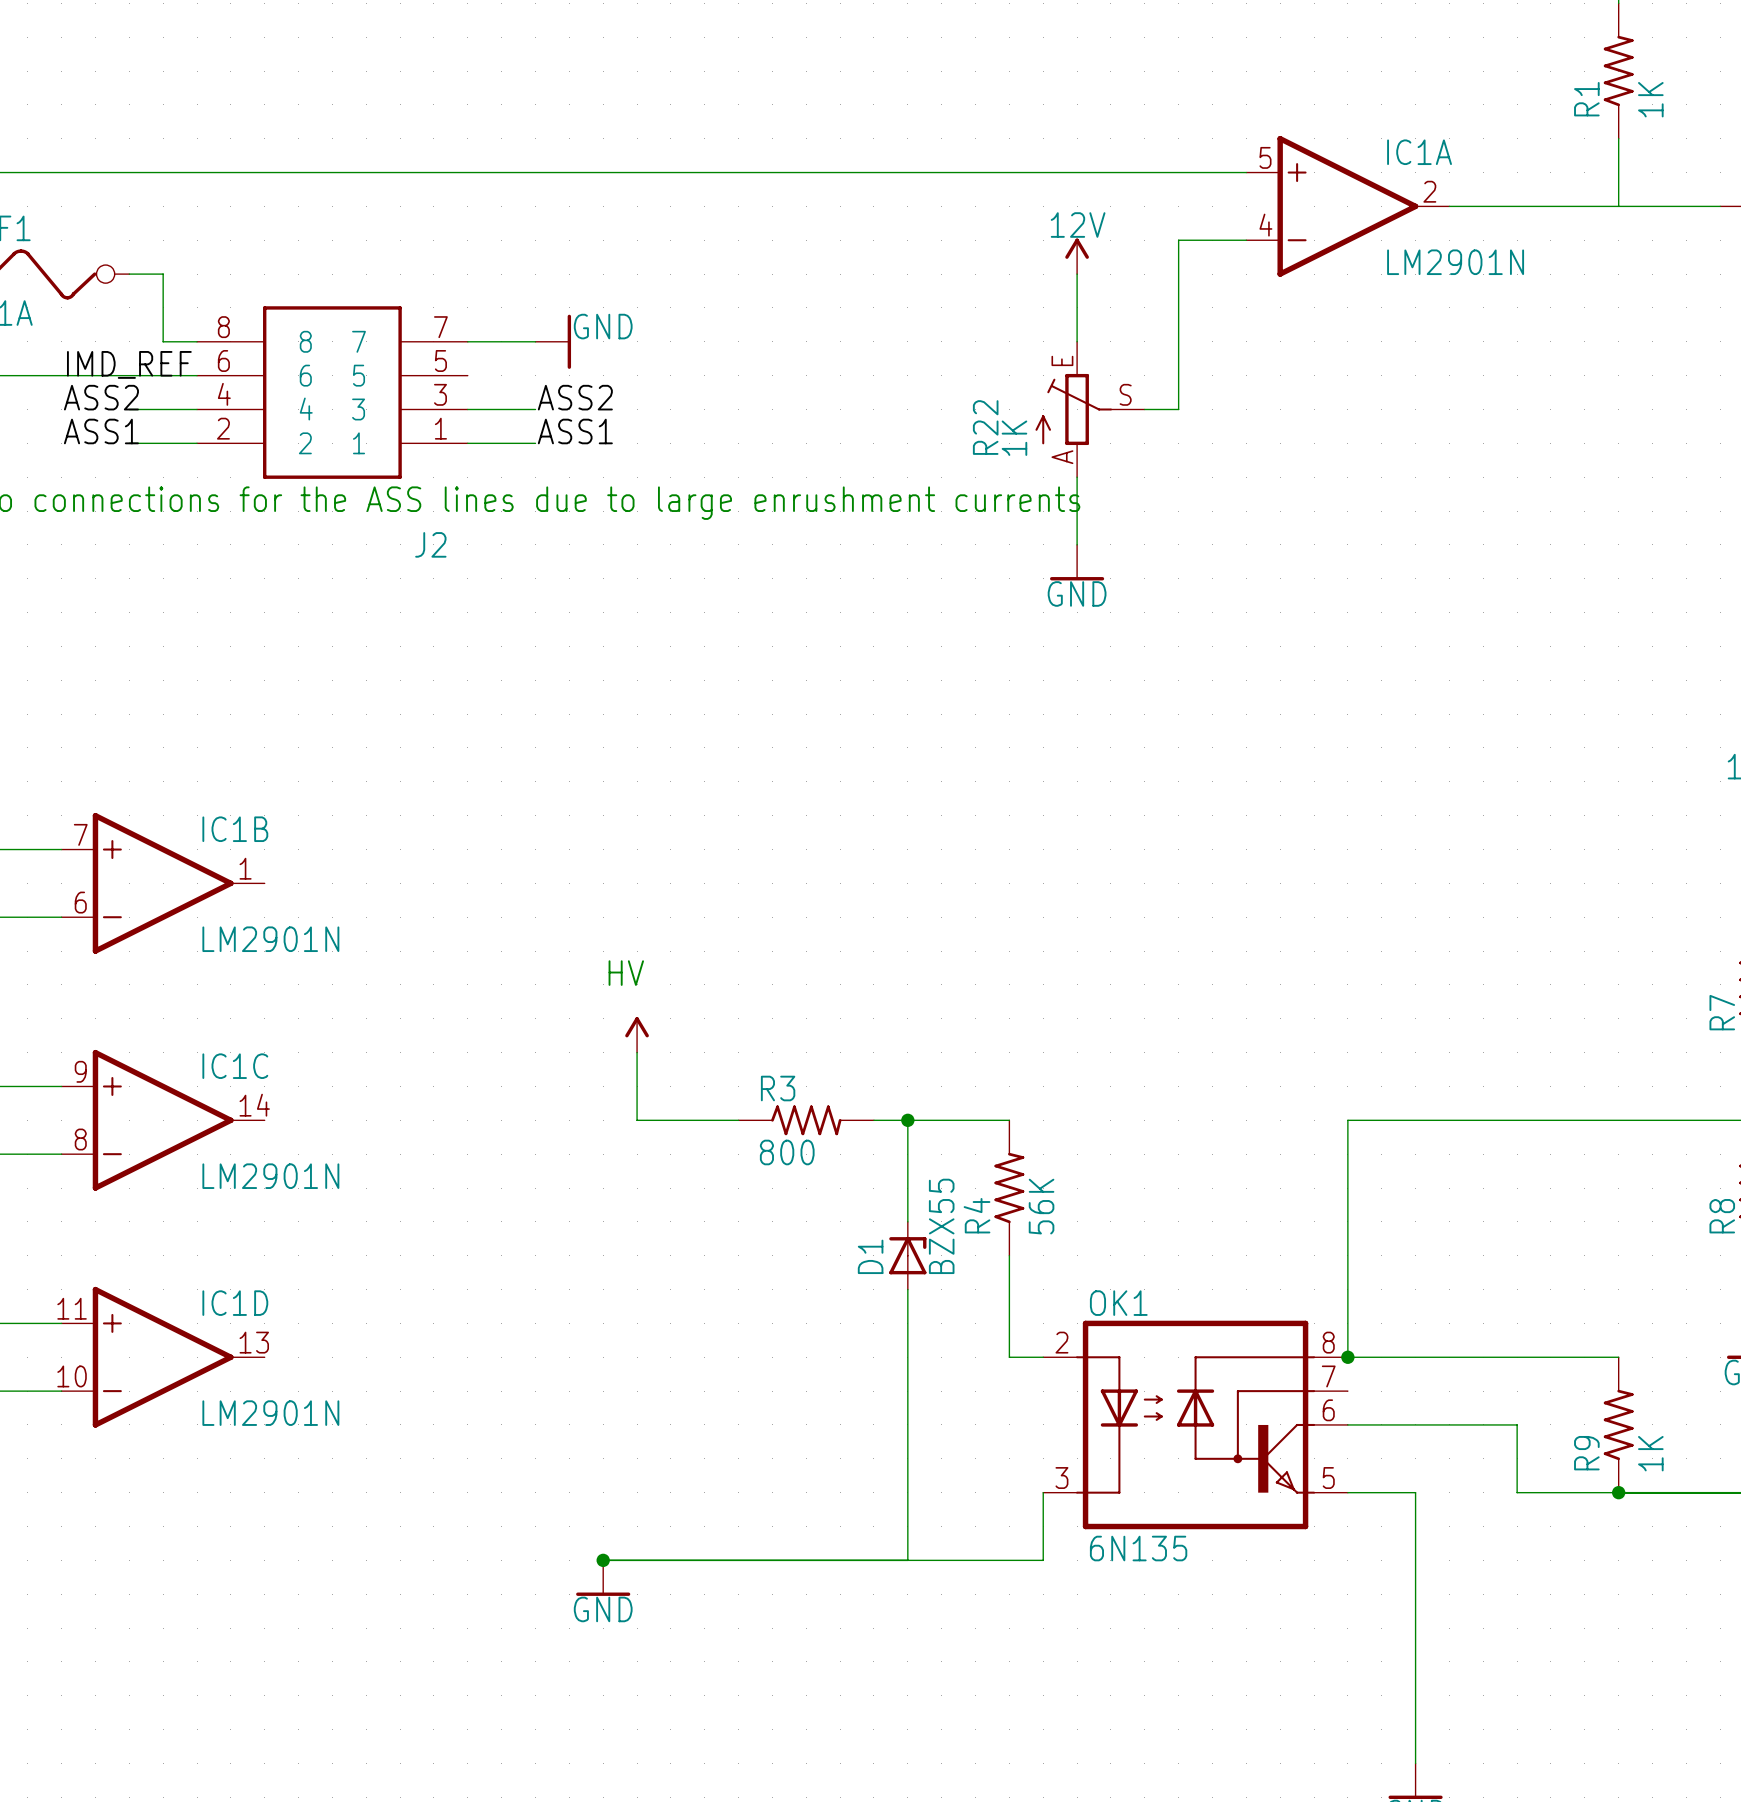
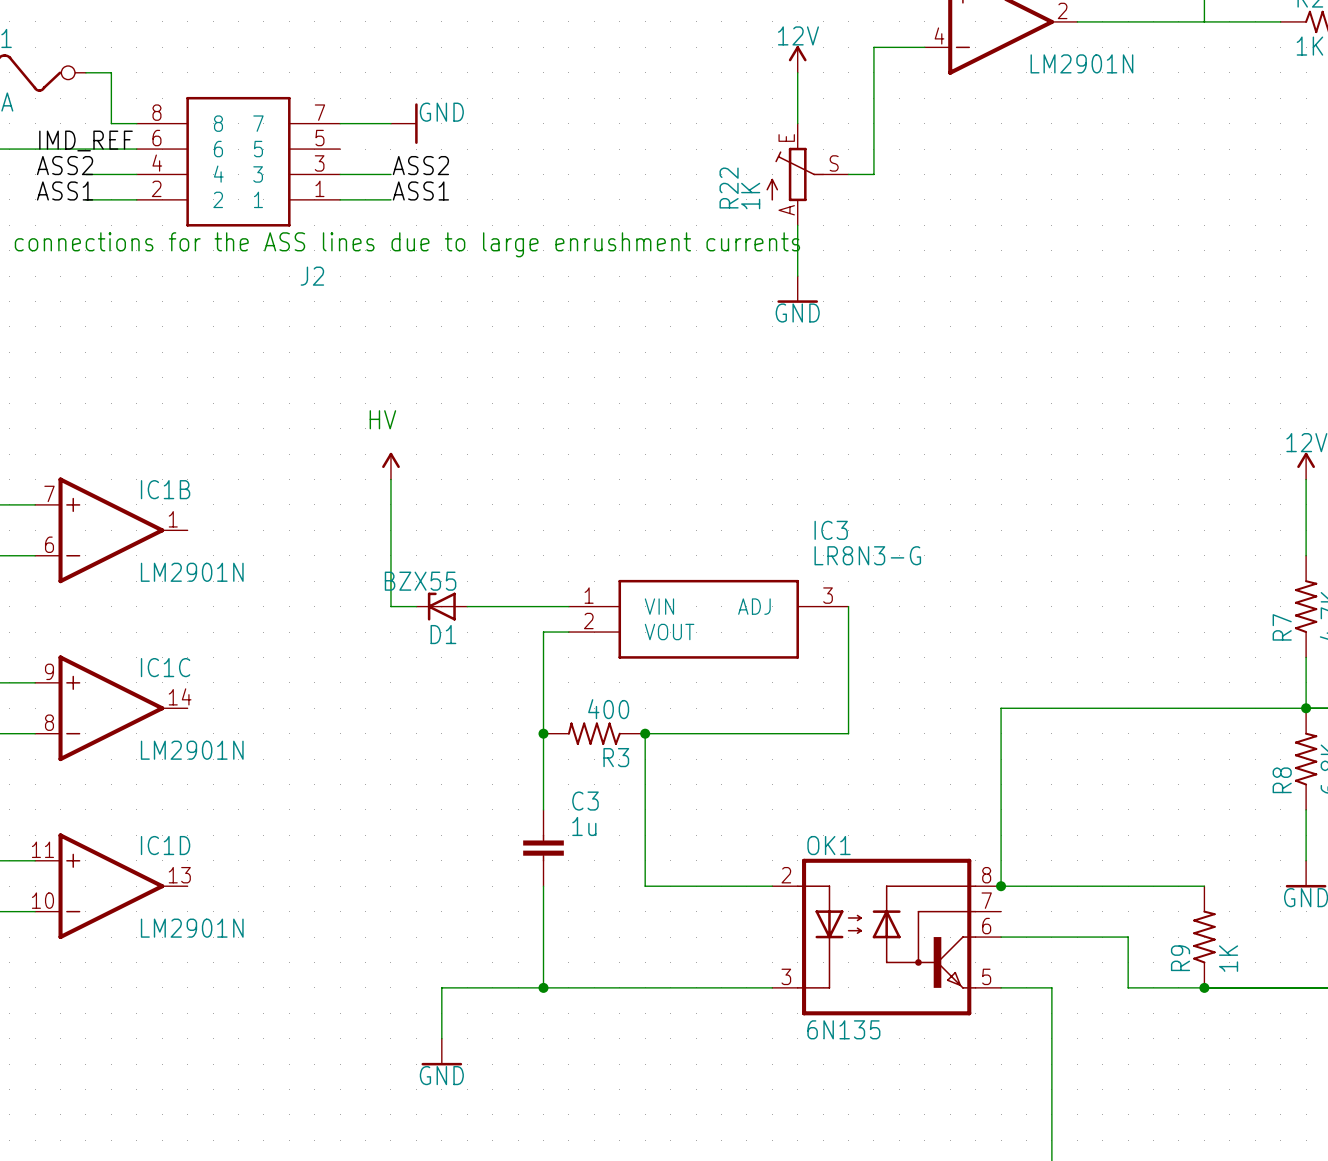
wire: none -> (390, 479) (390, 606) (416, 606)
text position: HV (626, 973) -> HV (382, 419)
IC3: none -> LR8N3-G (708, 619)
wire: none -> (568, 632) (543, 632) (543, 809)
power symbol position: (637, 1034) -> (390, 466)
wire: (637, 1052) (637, 1120) (738, 1120) -> none
R3 rotation: 0° (806, 1120) -> 180° (594, 733)
wire: (873, 1120) (1009, 1120) -> (467, 606) (568, 606)
wire: (907, 1120) (907, 1221) -> none
junction position: (907, 1120) -> (645, 733)
R3 value: 800 (787, 1152) -> 400 (608, 709)
junction: none -> (543, 733)
R4: 56K (1009, 1188) -> none
D1 rotation: 0° (907, 1255) -> 90° counterclockwise (441, 606)
D1 position: (907, 1255) -> (441, 606)
wire: (1009, 1255) (1009, 1357) -> (848, 606) (848, 733) (645, 733) (645, 886) (746, 886)
wire: (907, 1289) (907, 1560) -> none
C3: none -> 1u (543, 848)
wire: none -> (543, 886) (543, 987)
junction: none -> (543, 987)
wire: (1043, 1492) (1043, 1560) (603, 1560) -> (772, 987) (441, 987) (441, 1038)
junction: (603, 1560) -> none

